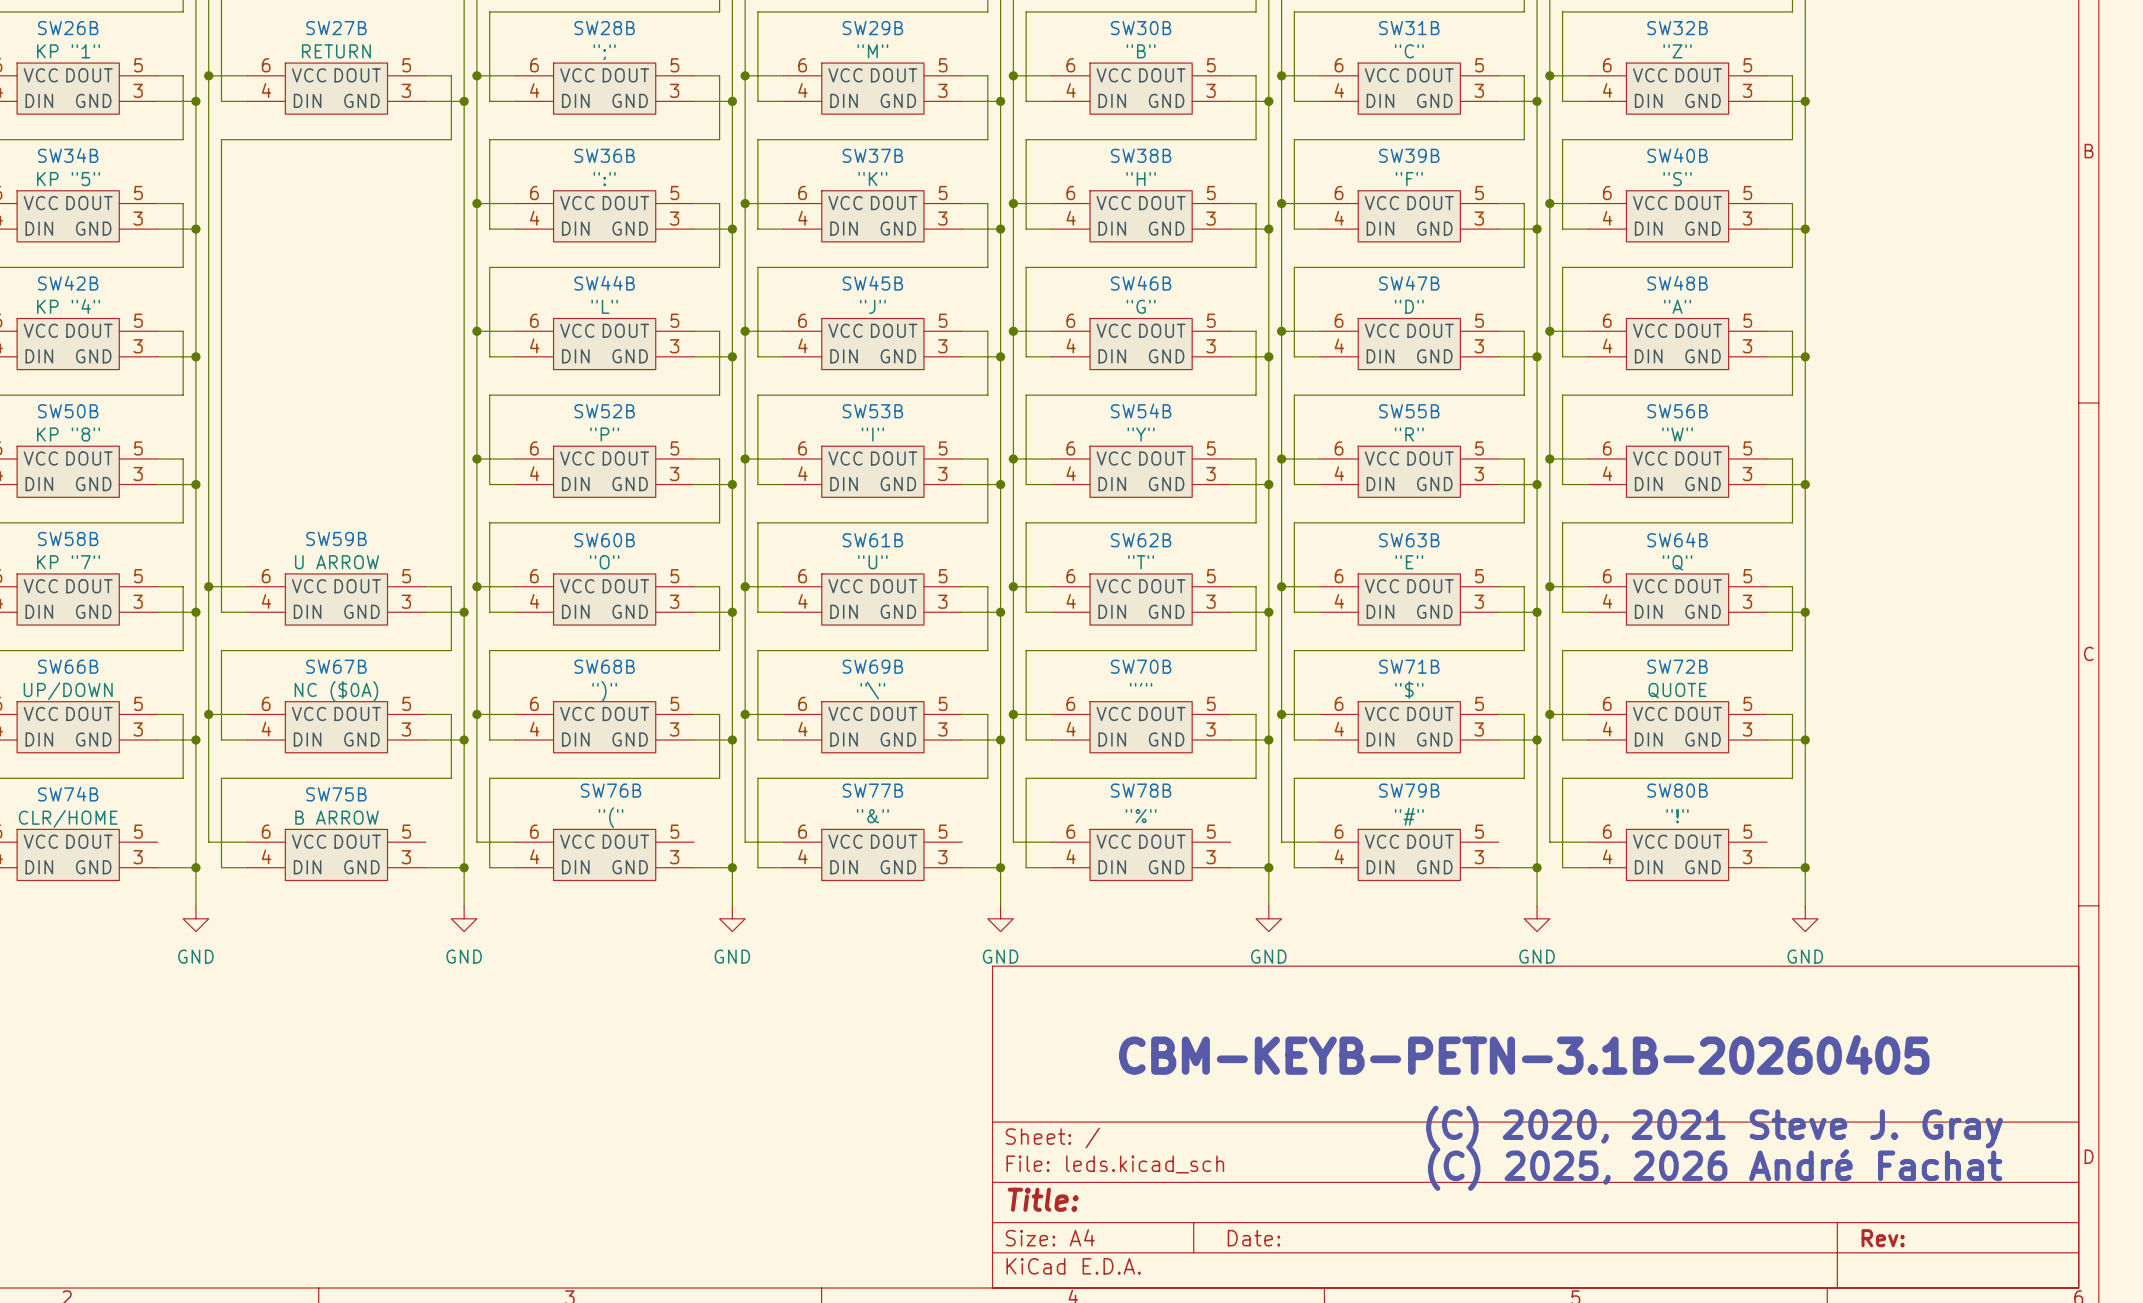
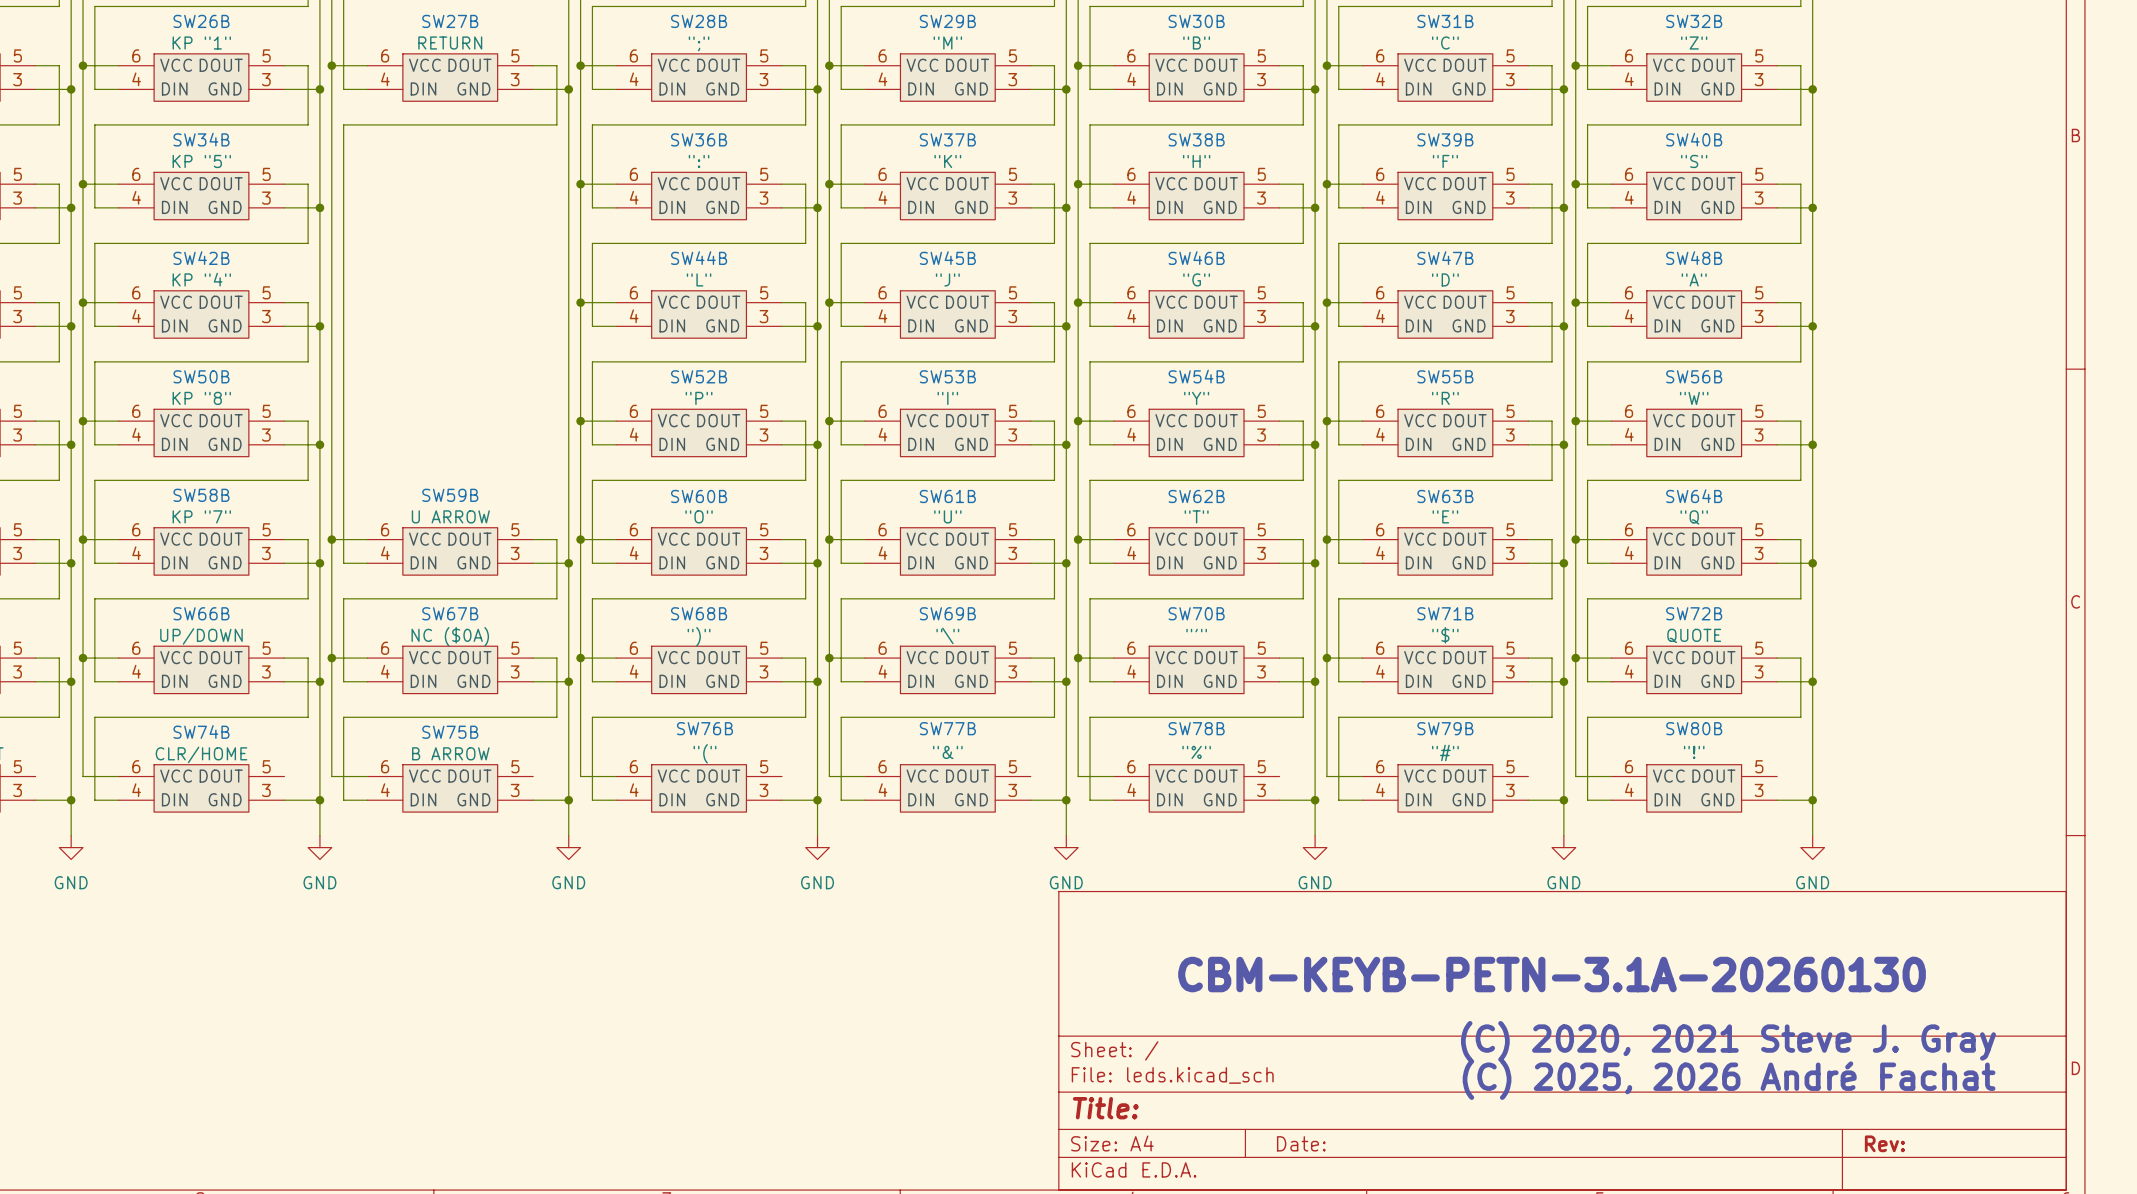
text: CBM-KEYB-PETN-3.1B-20260405 (1524, 1054) -> CBM-KEYB-PETN-3.1A-20260130 (1552, 974)

